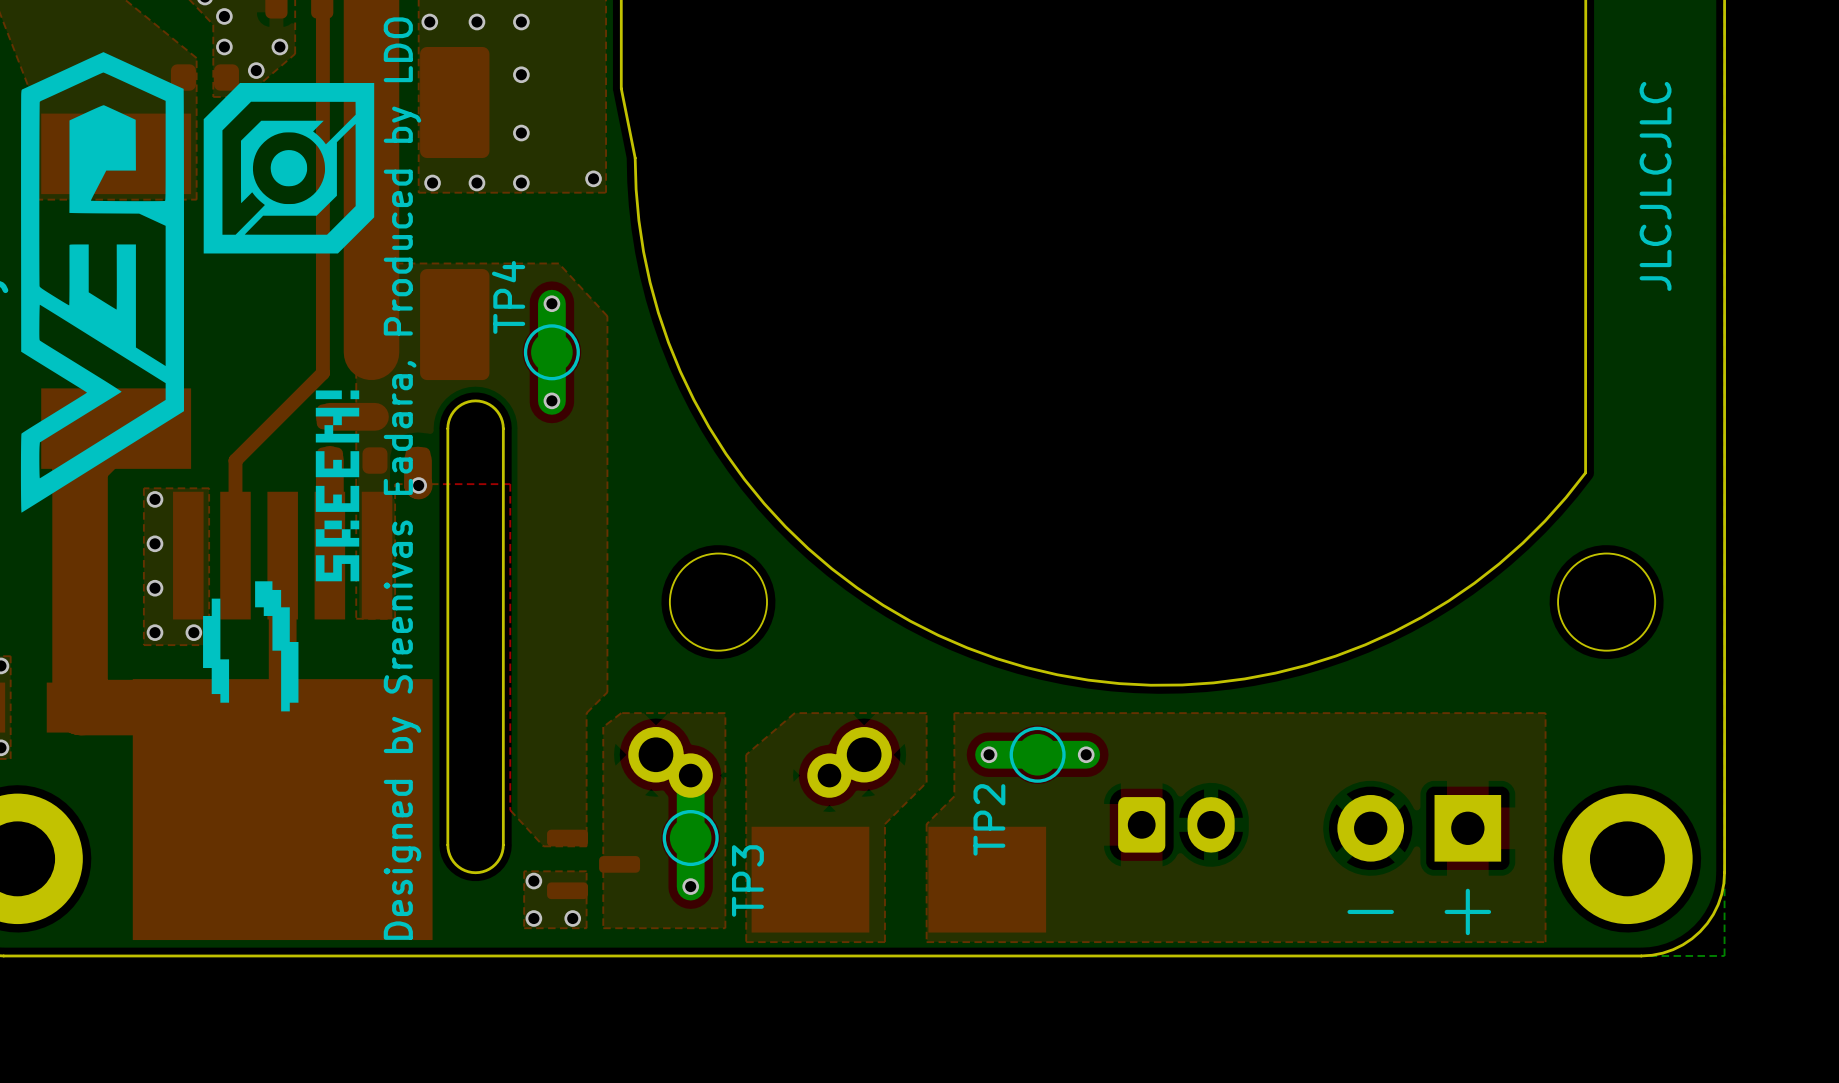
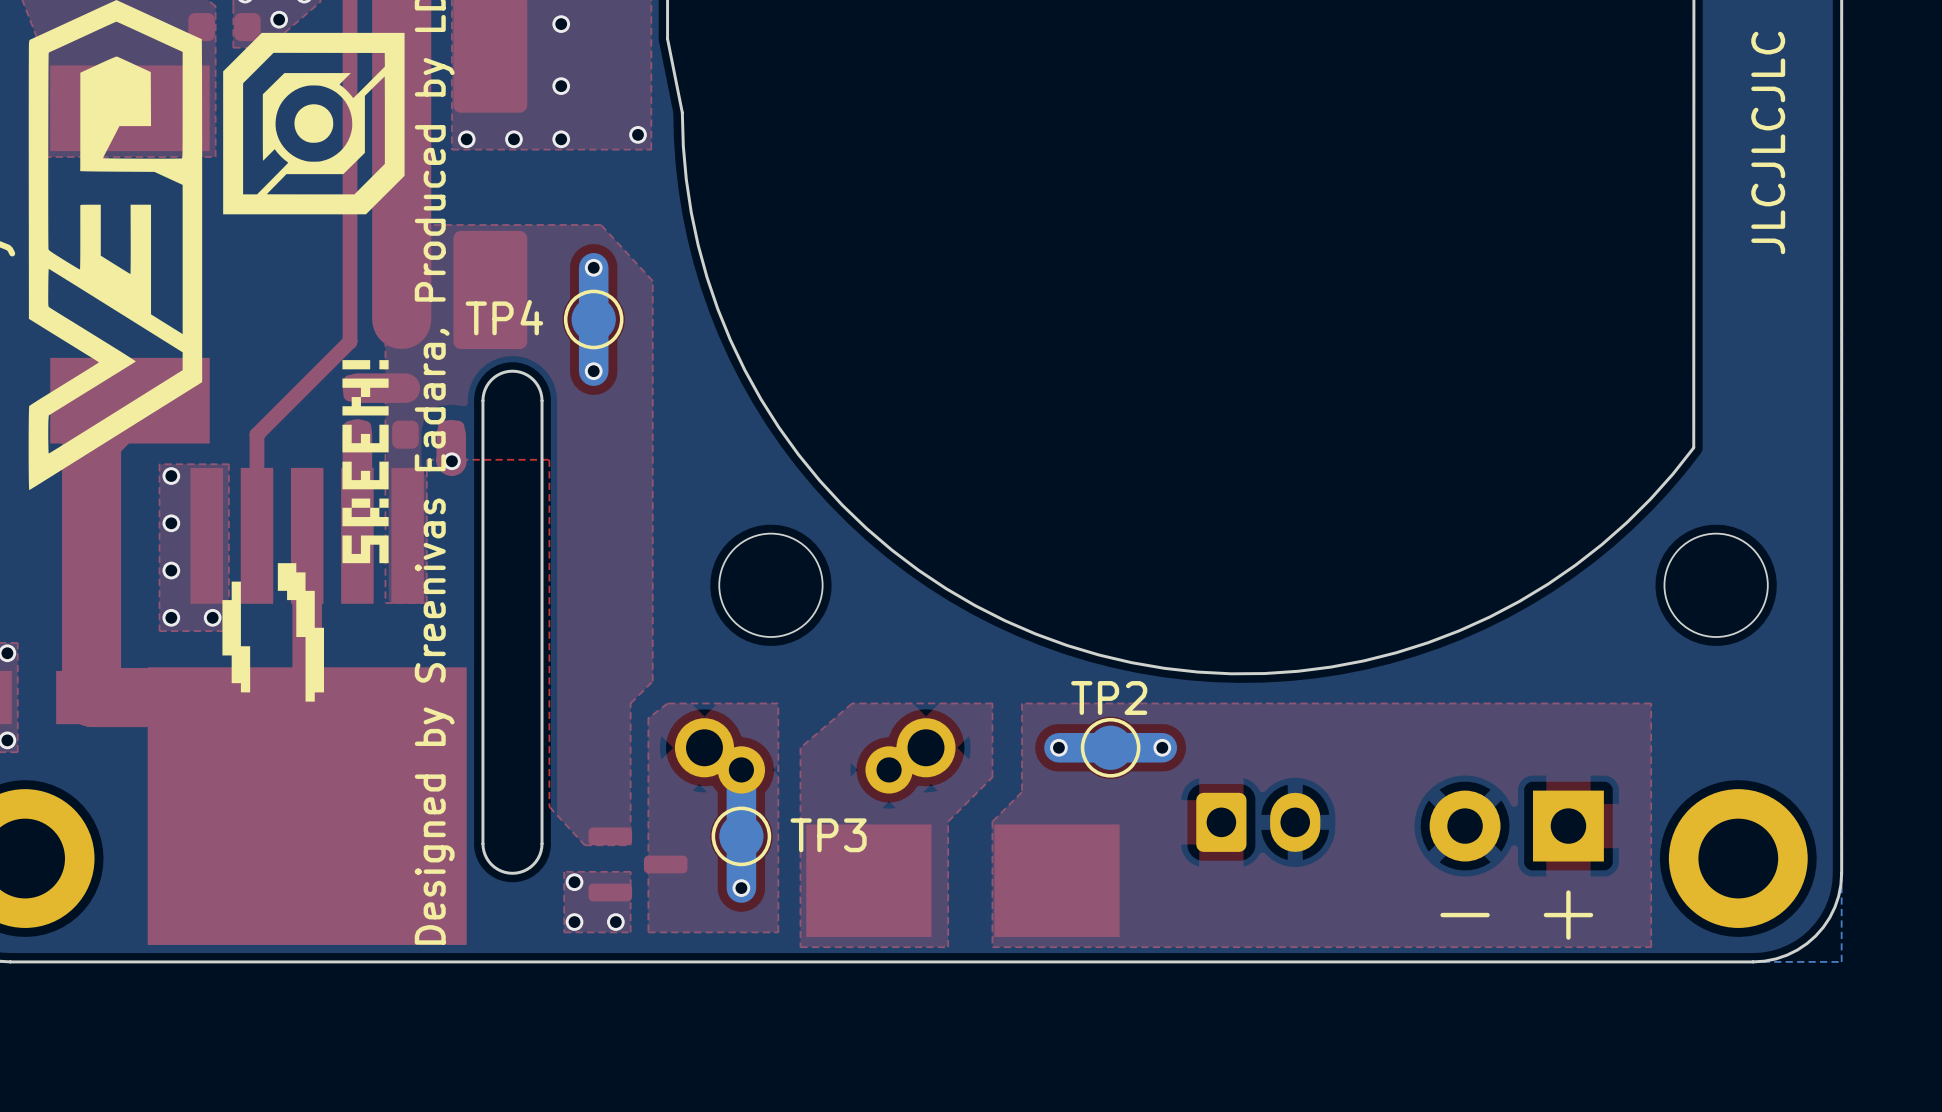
TP4 name rotation: 0° (508, 297) -> 90° clockwise (504, 317)
TP2 name rotation: 0° (989, 819) -> 90° clockwise (1109, 697)
TP2 name position: TP2 (989, 819) -> TP2 (1109, 697)
TP3 name rotation: 0° (747, 880) -> 90° clockwise (828, 835)

